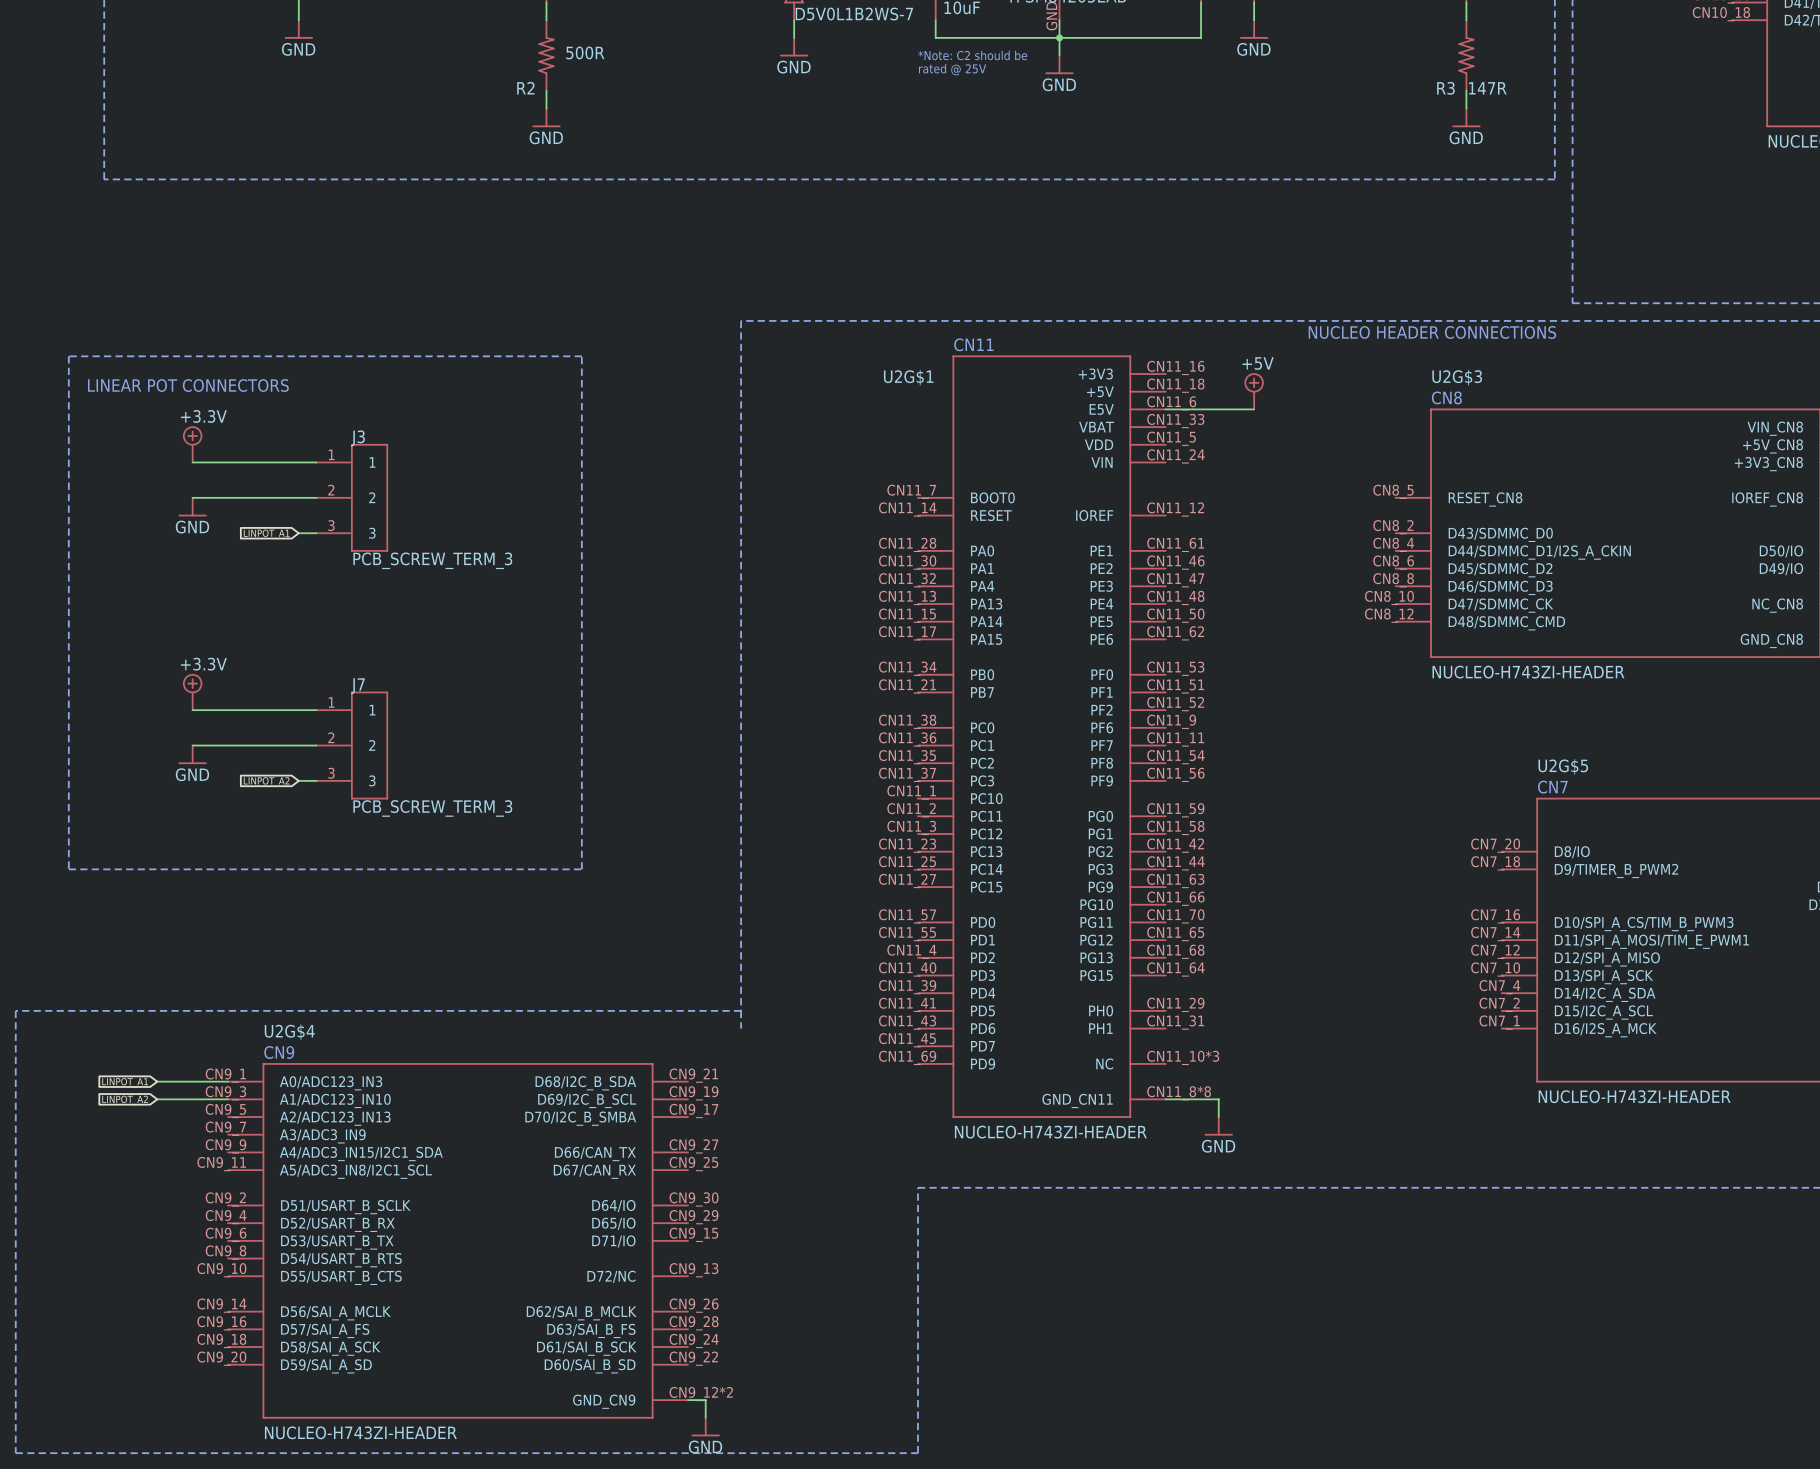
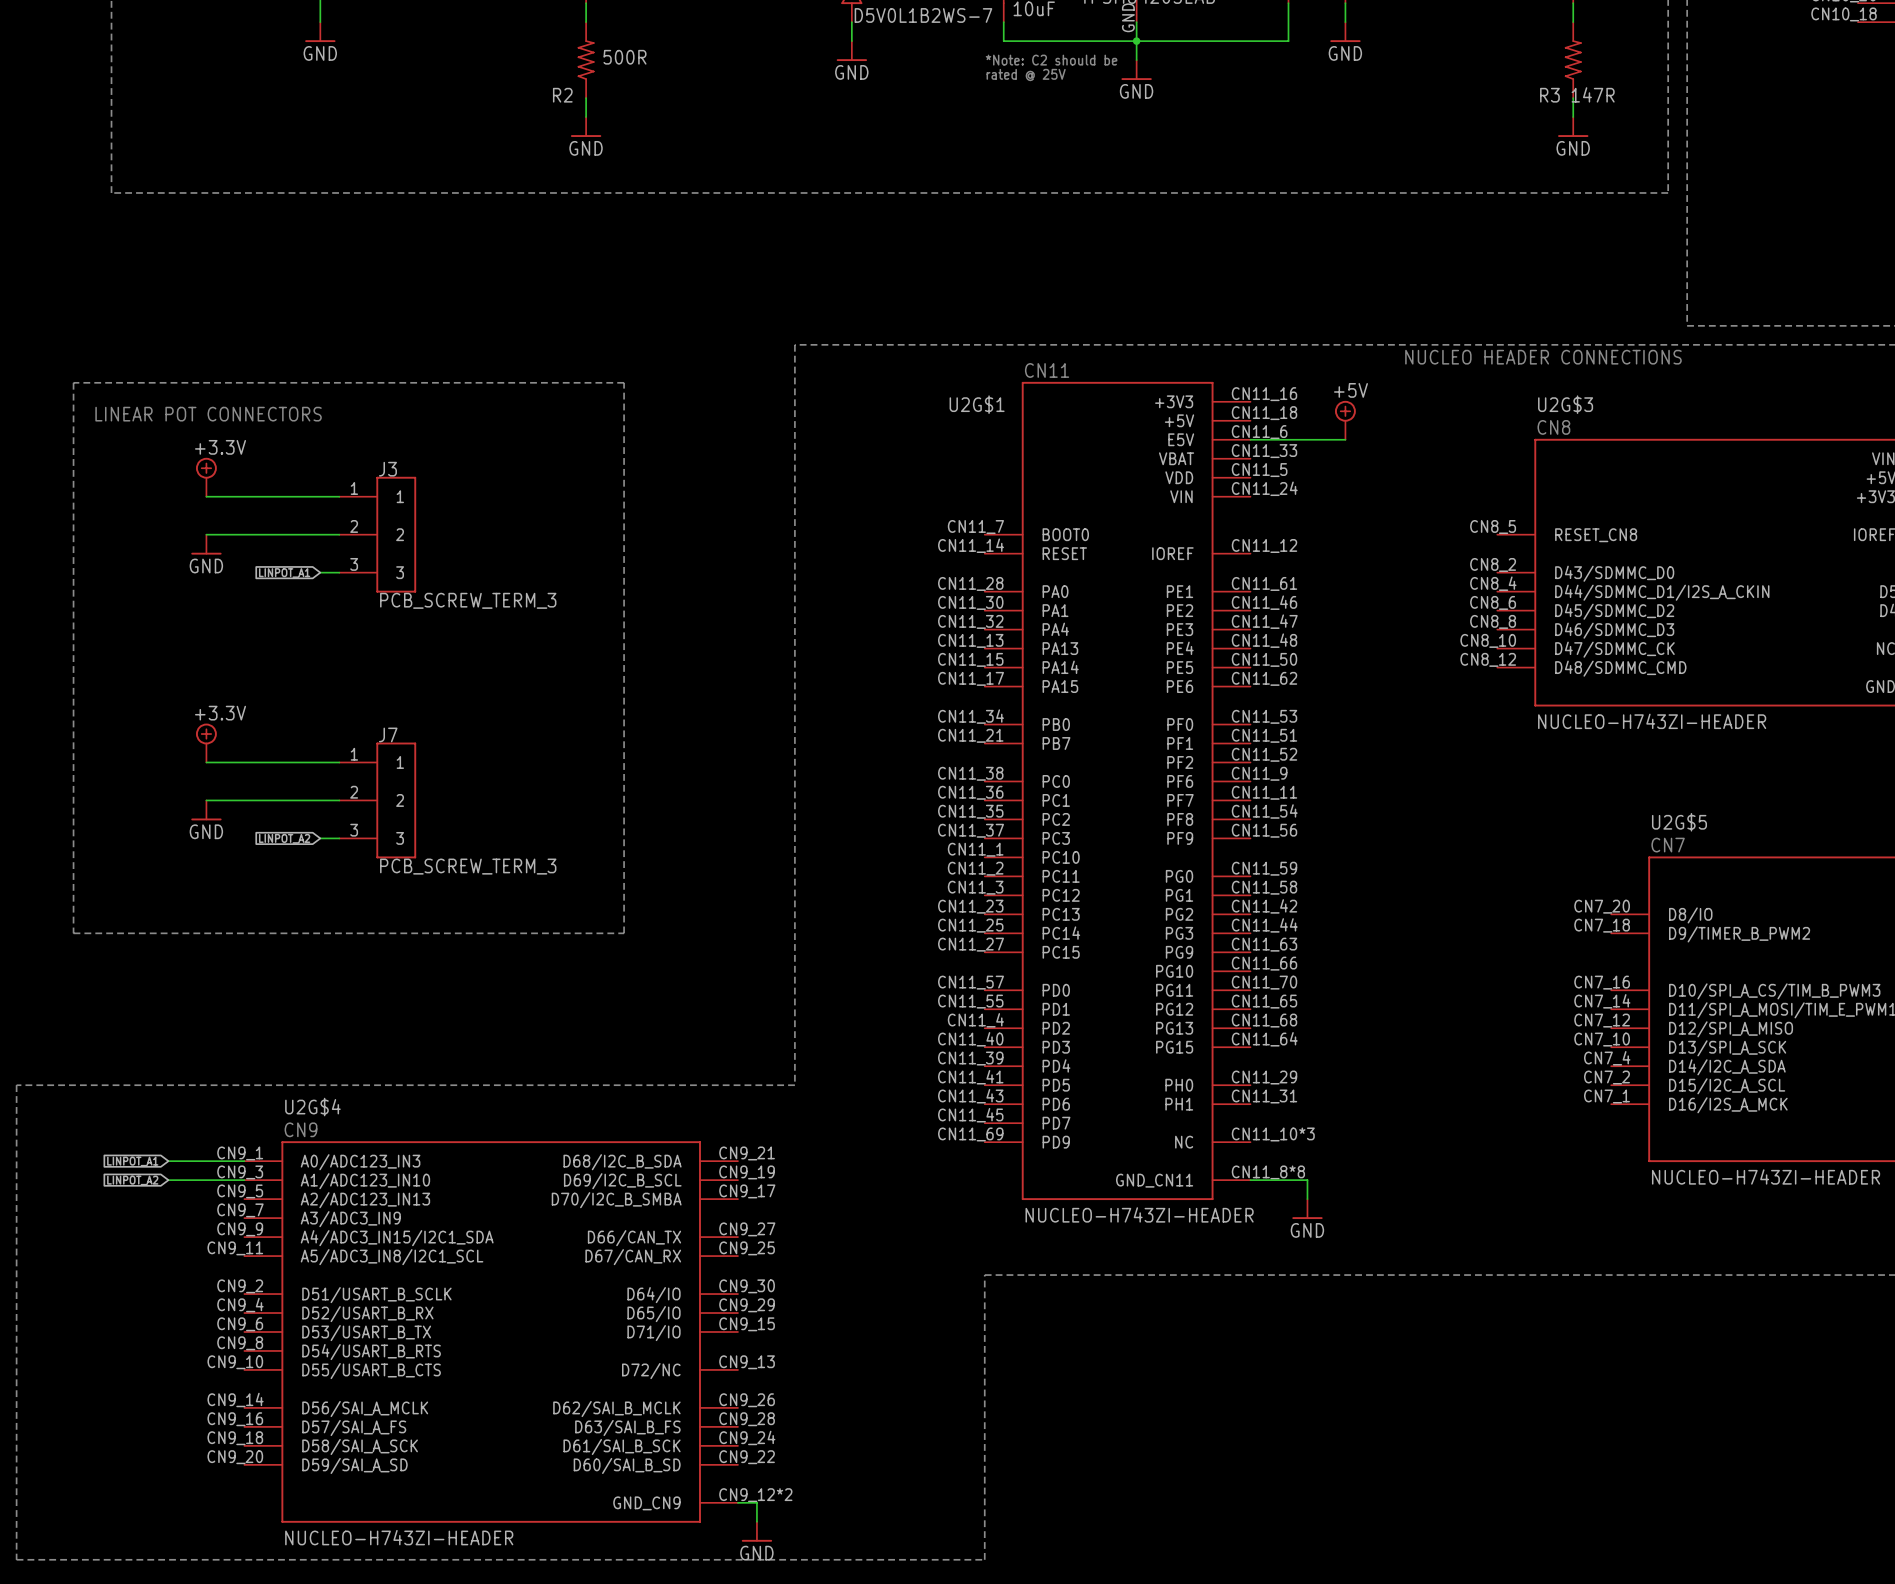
line: (741, 1010) (741, 1028) -> none

